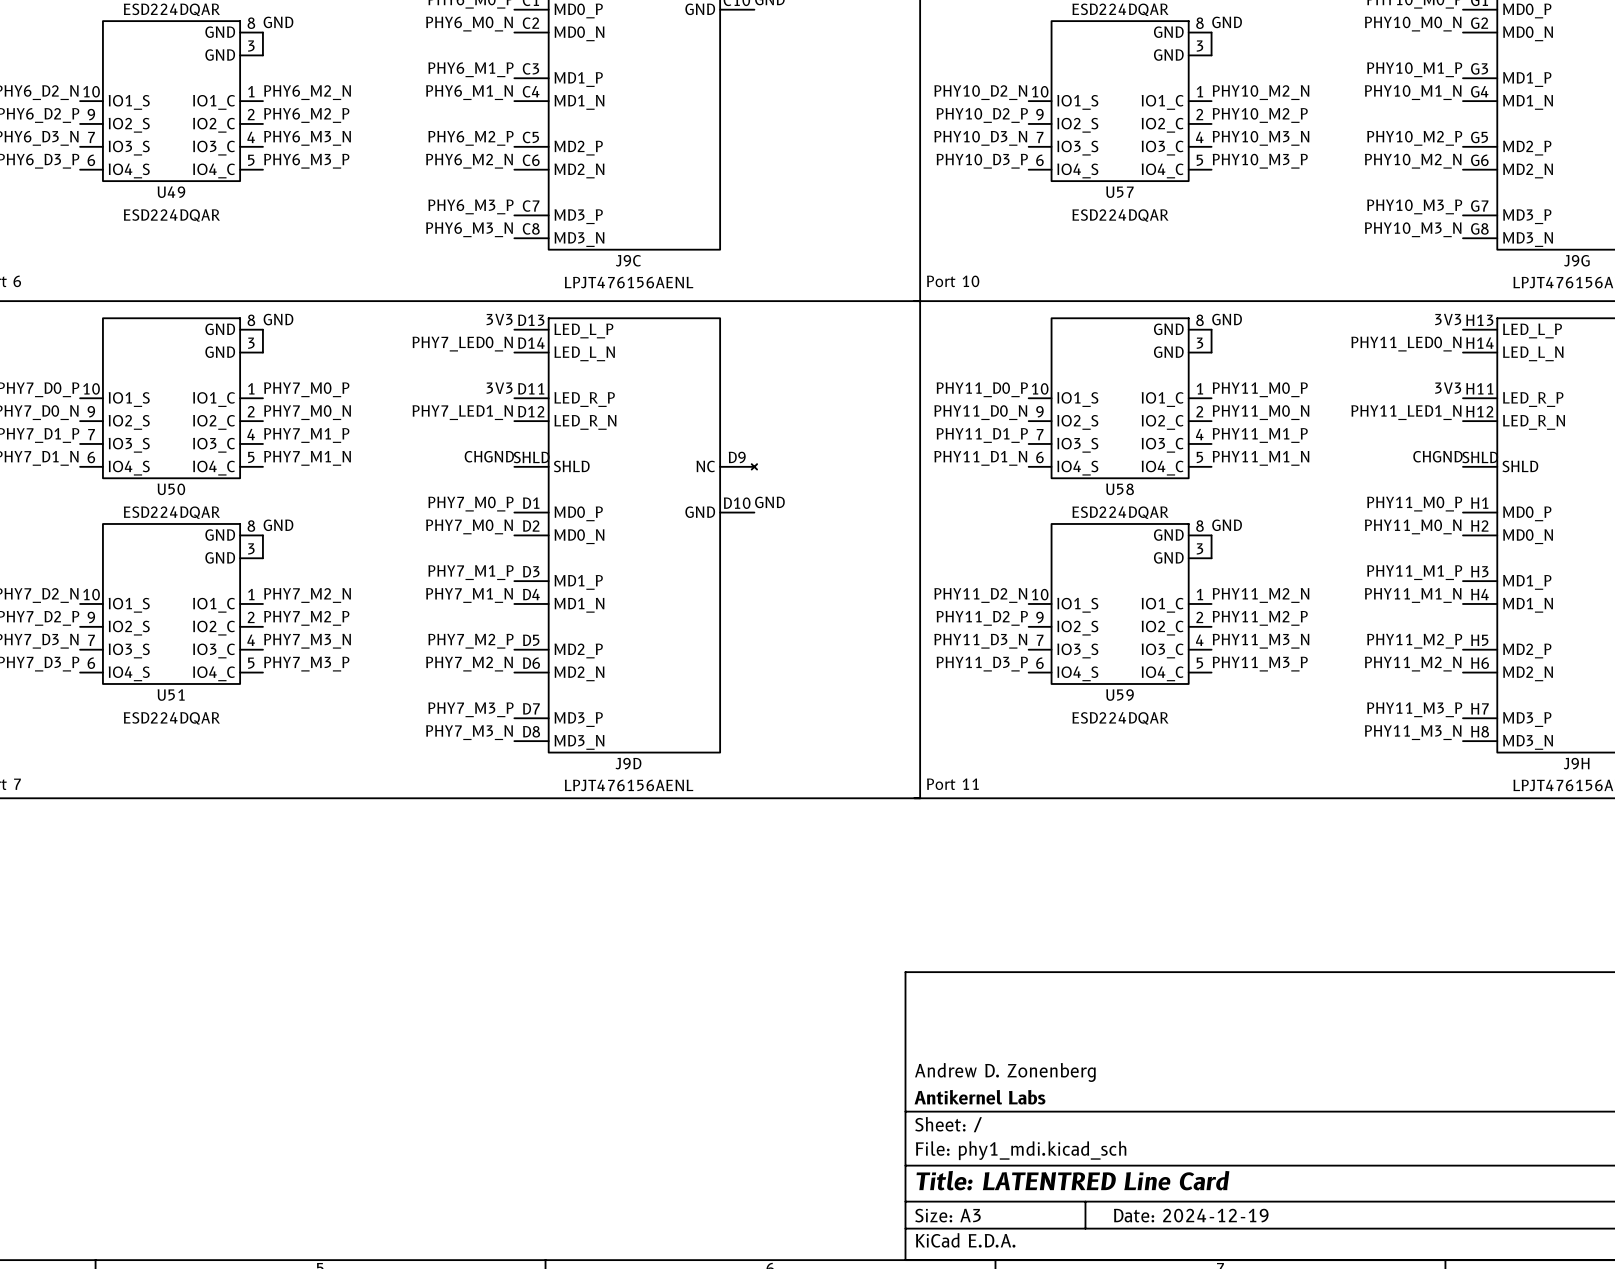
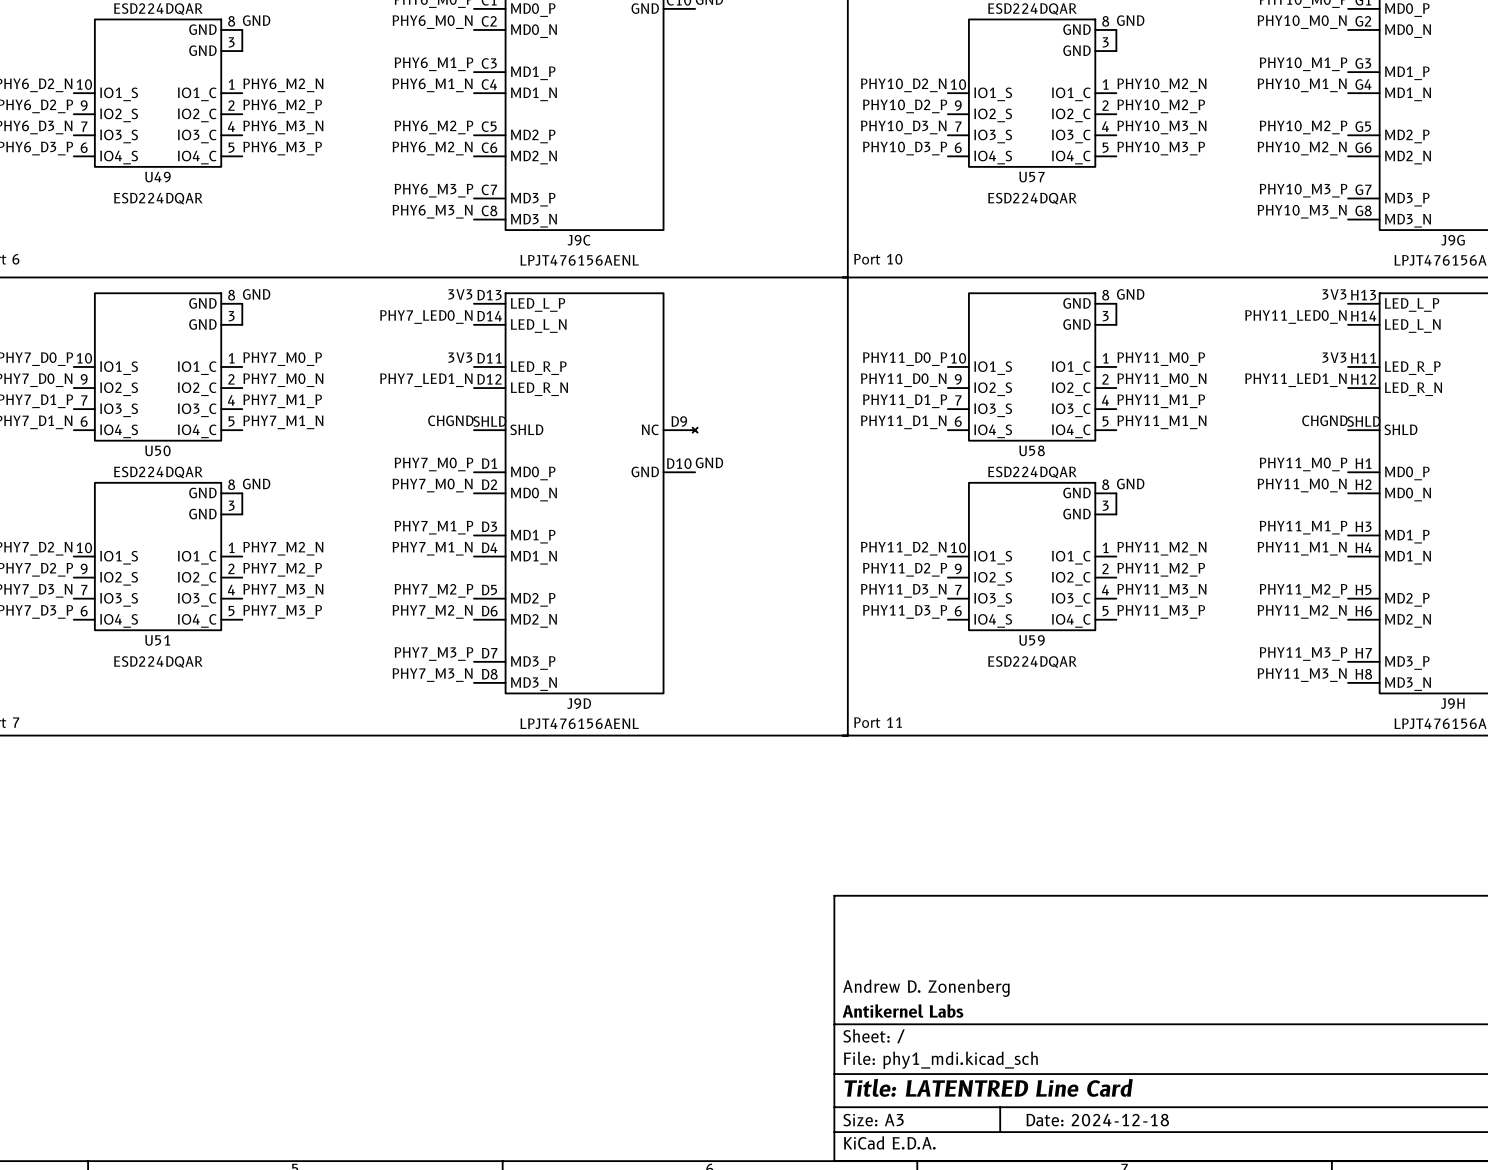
title block: Date: 2024-12-19 (1191, 1215) -> Date: 2024-12-18 (1097, 1120)

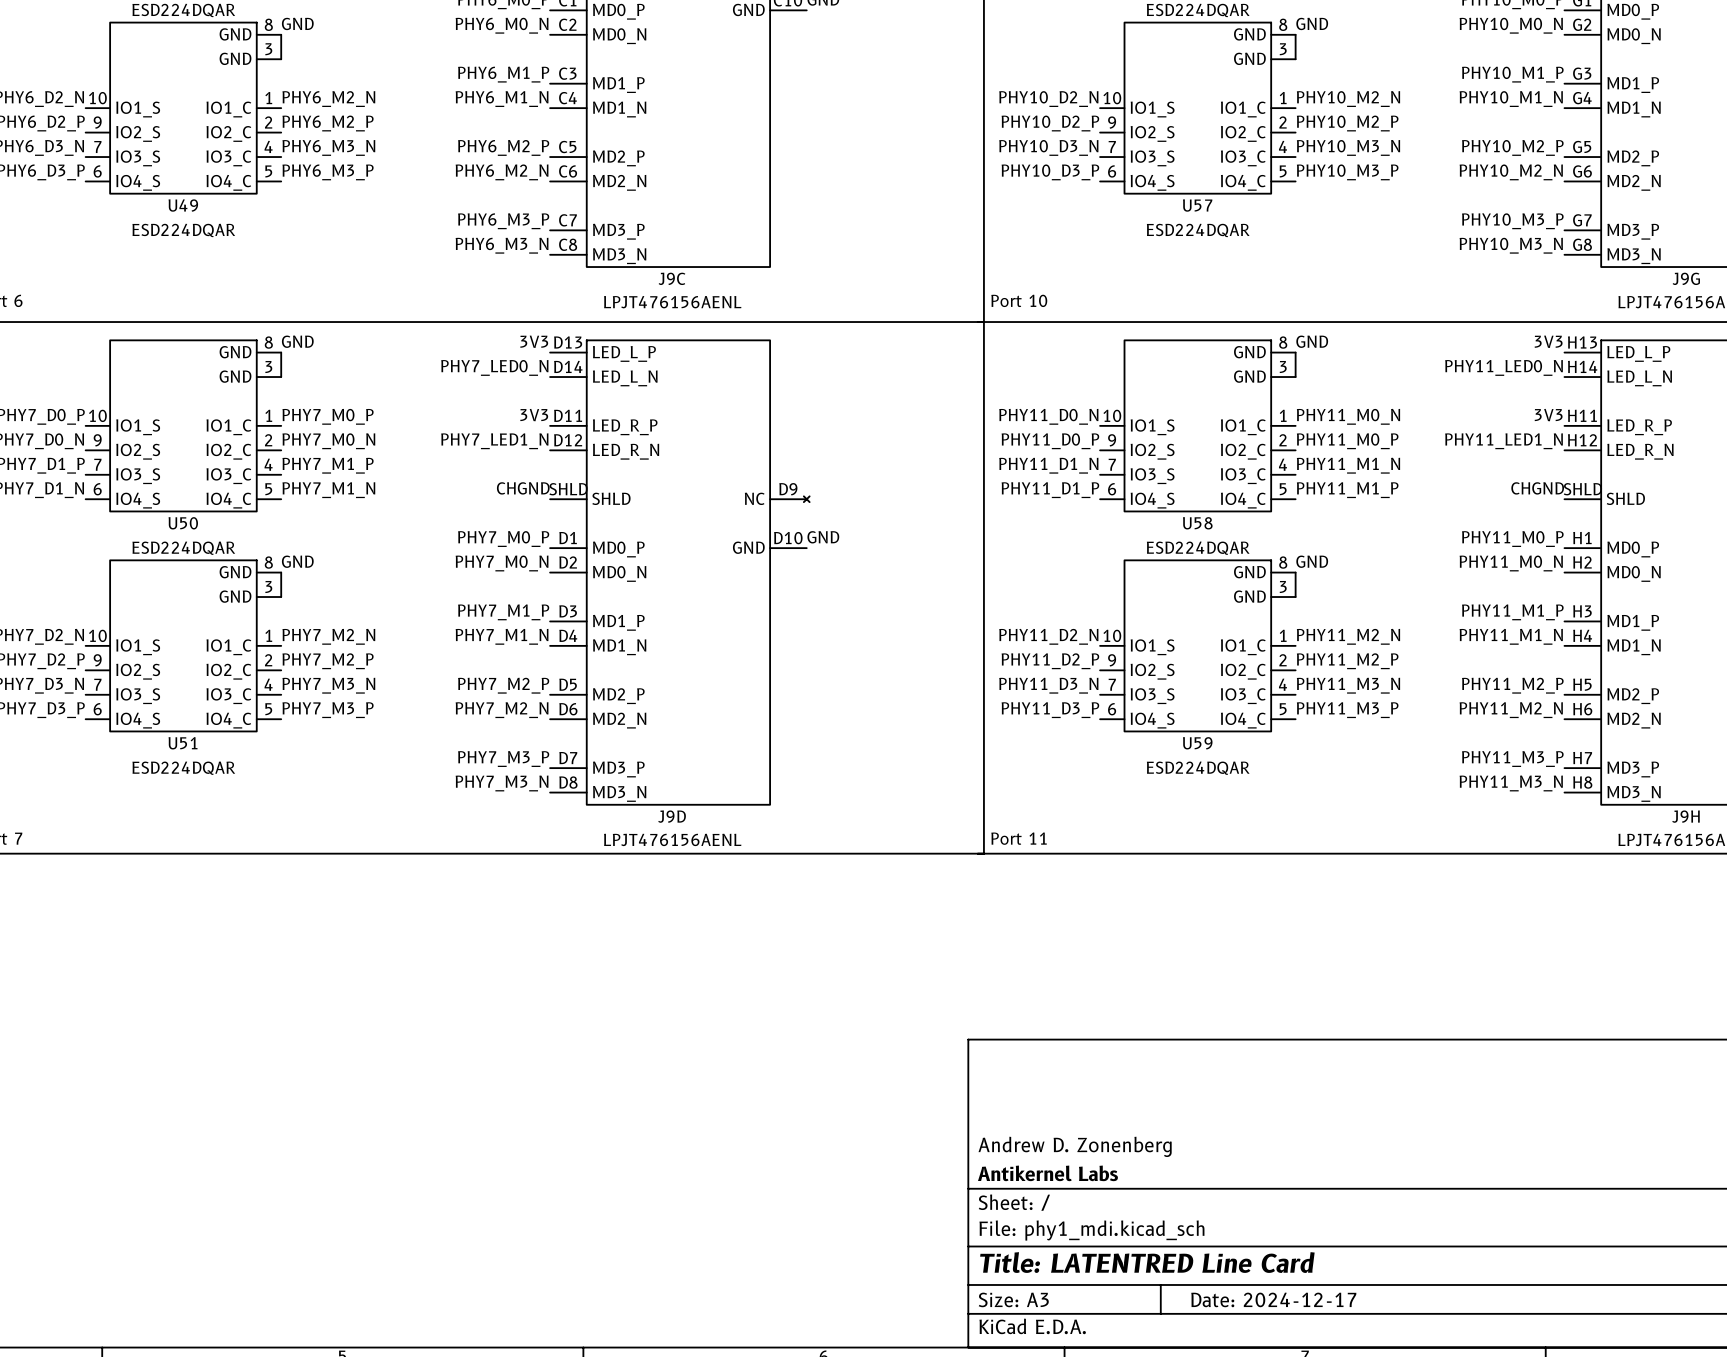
label: PHY11_D0_P (905, 359) -> PHY11_D0_N (1048, 416)
label: PHY11_M0_P (1161, 359) -> PHY11_M0_N (1348, 416)
label: PHY11_D0_N (903, 380) -> PHY11_D0_P (1050, 441)
label: PHY11_M0_N (1161, 380) -> PHY11_M0_P (1347, 441)
label: PHY11_D1_P (905, 401) -> PHY11_D1_N (1048, 465)
label: PHY11_M1_P (1161, 401) -> PHY11_M1_N (1348, 465)
label: PHY11_D1_N (903, 422) -> PHY11_D1_P (1050, 490)
label: PHY11_M1_N (1161, 422) -> PHY11_M1_P (1347, 490)
title block: Date: 2024-12-18 (1097, 1120) -> Date: 2024-12-17 (1273, 1299)

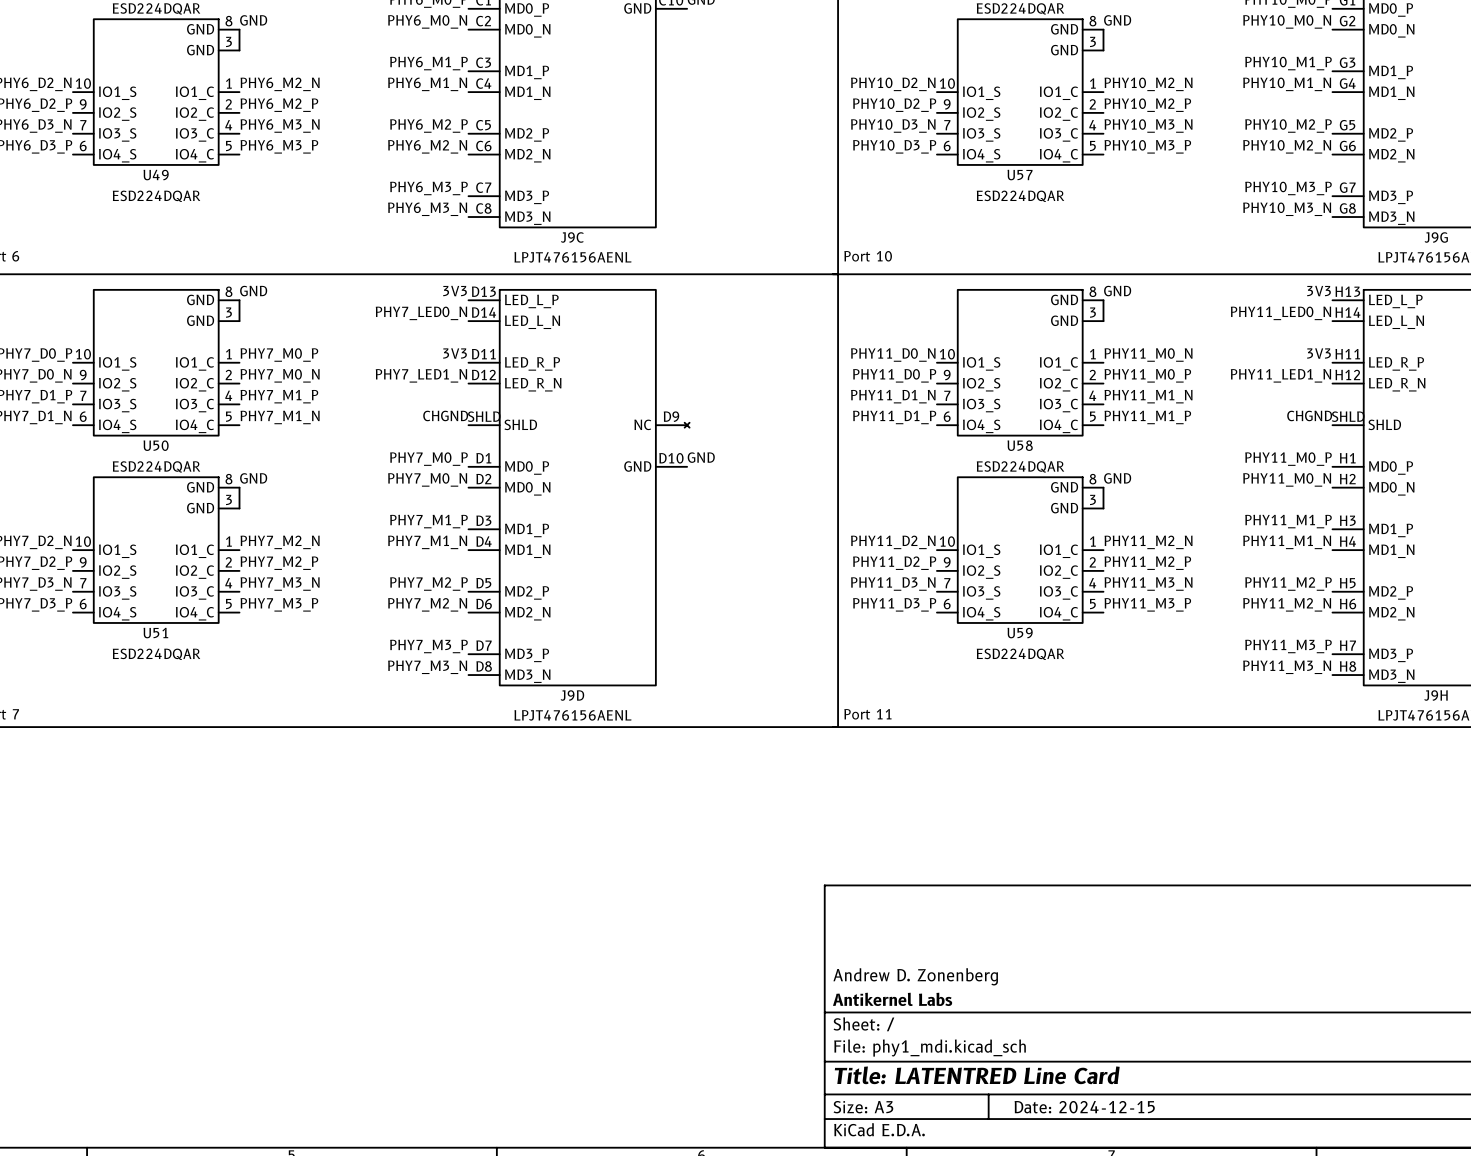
title block: Date: 2024-12-17 (1273, 1299) -> Date: 2024-12-15 (1084, 1107)

